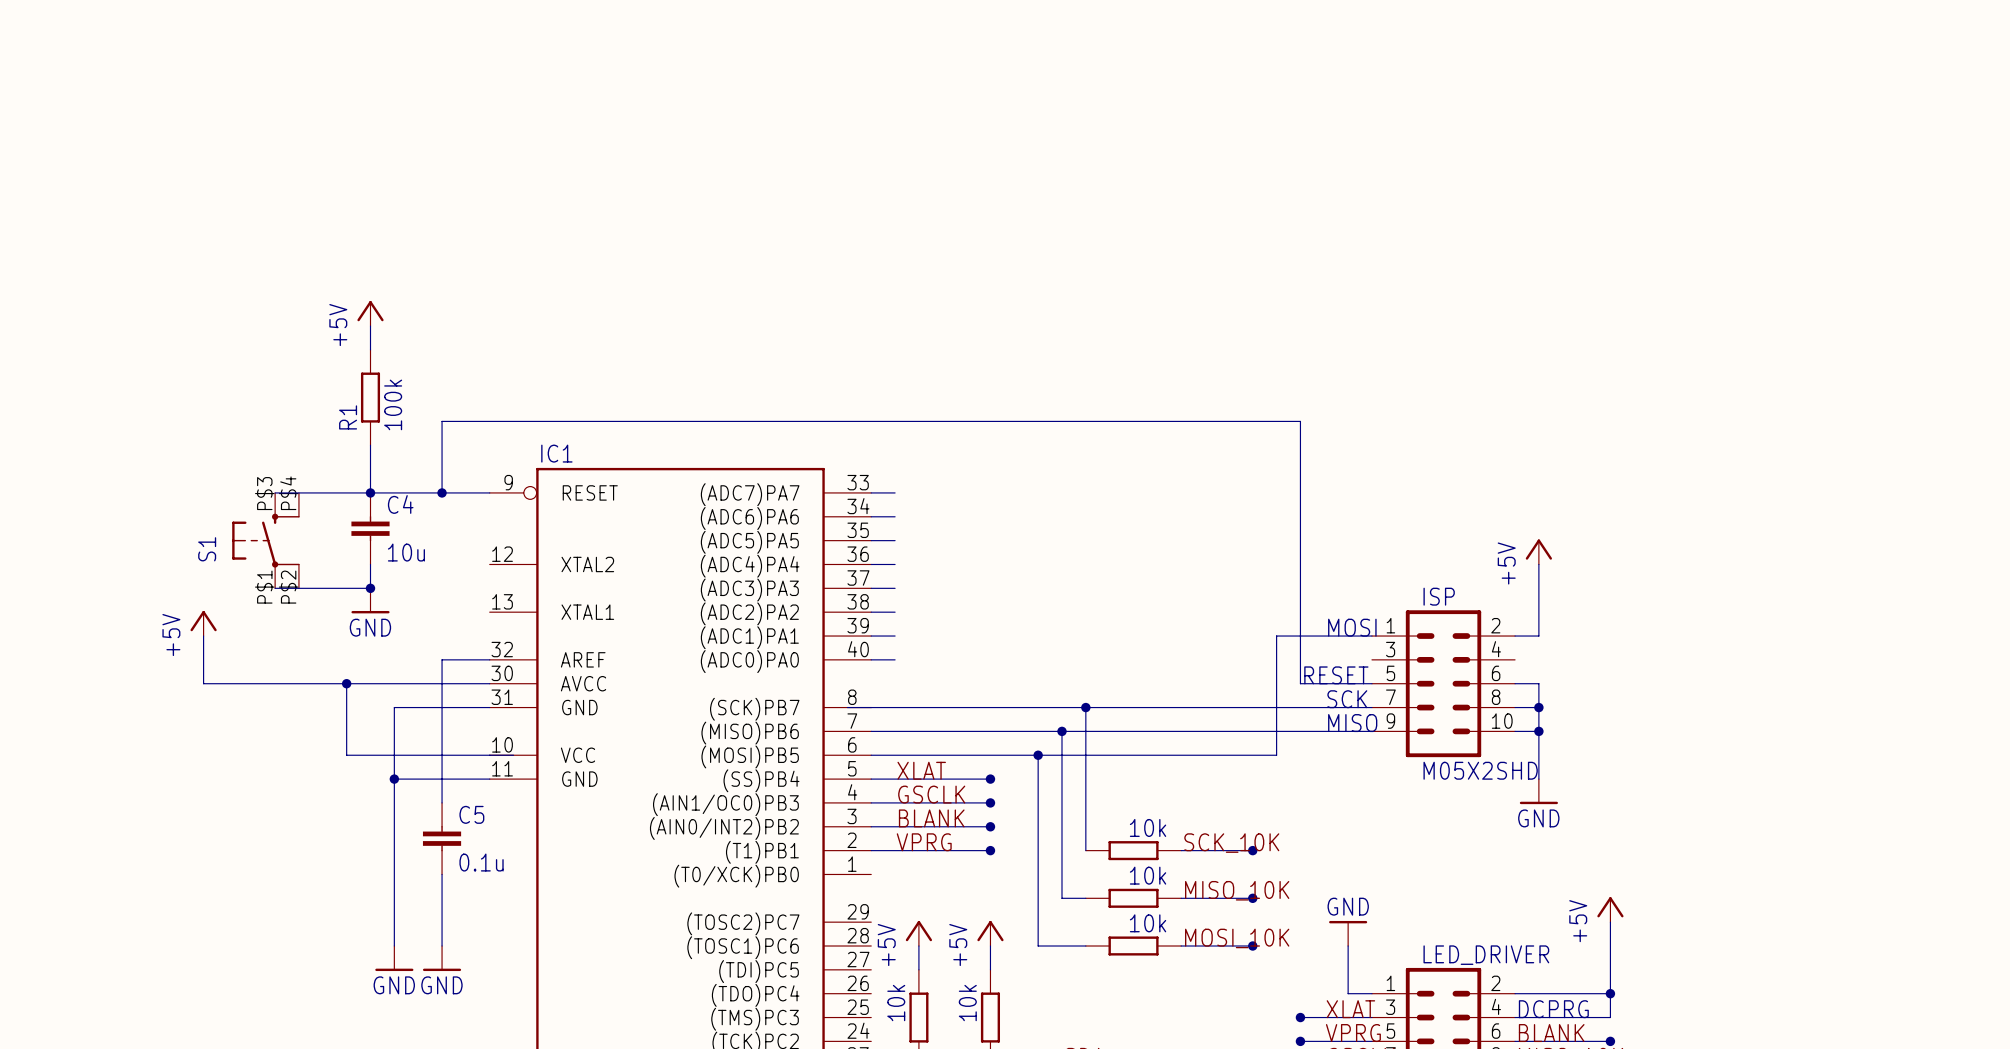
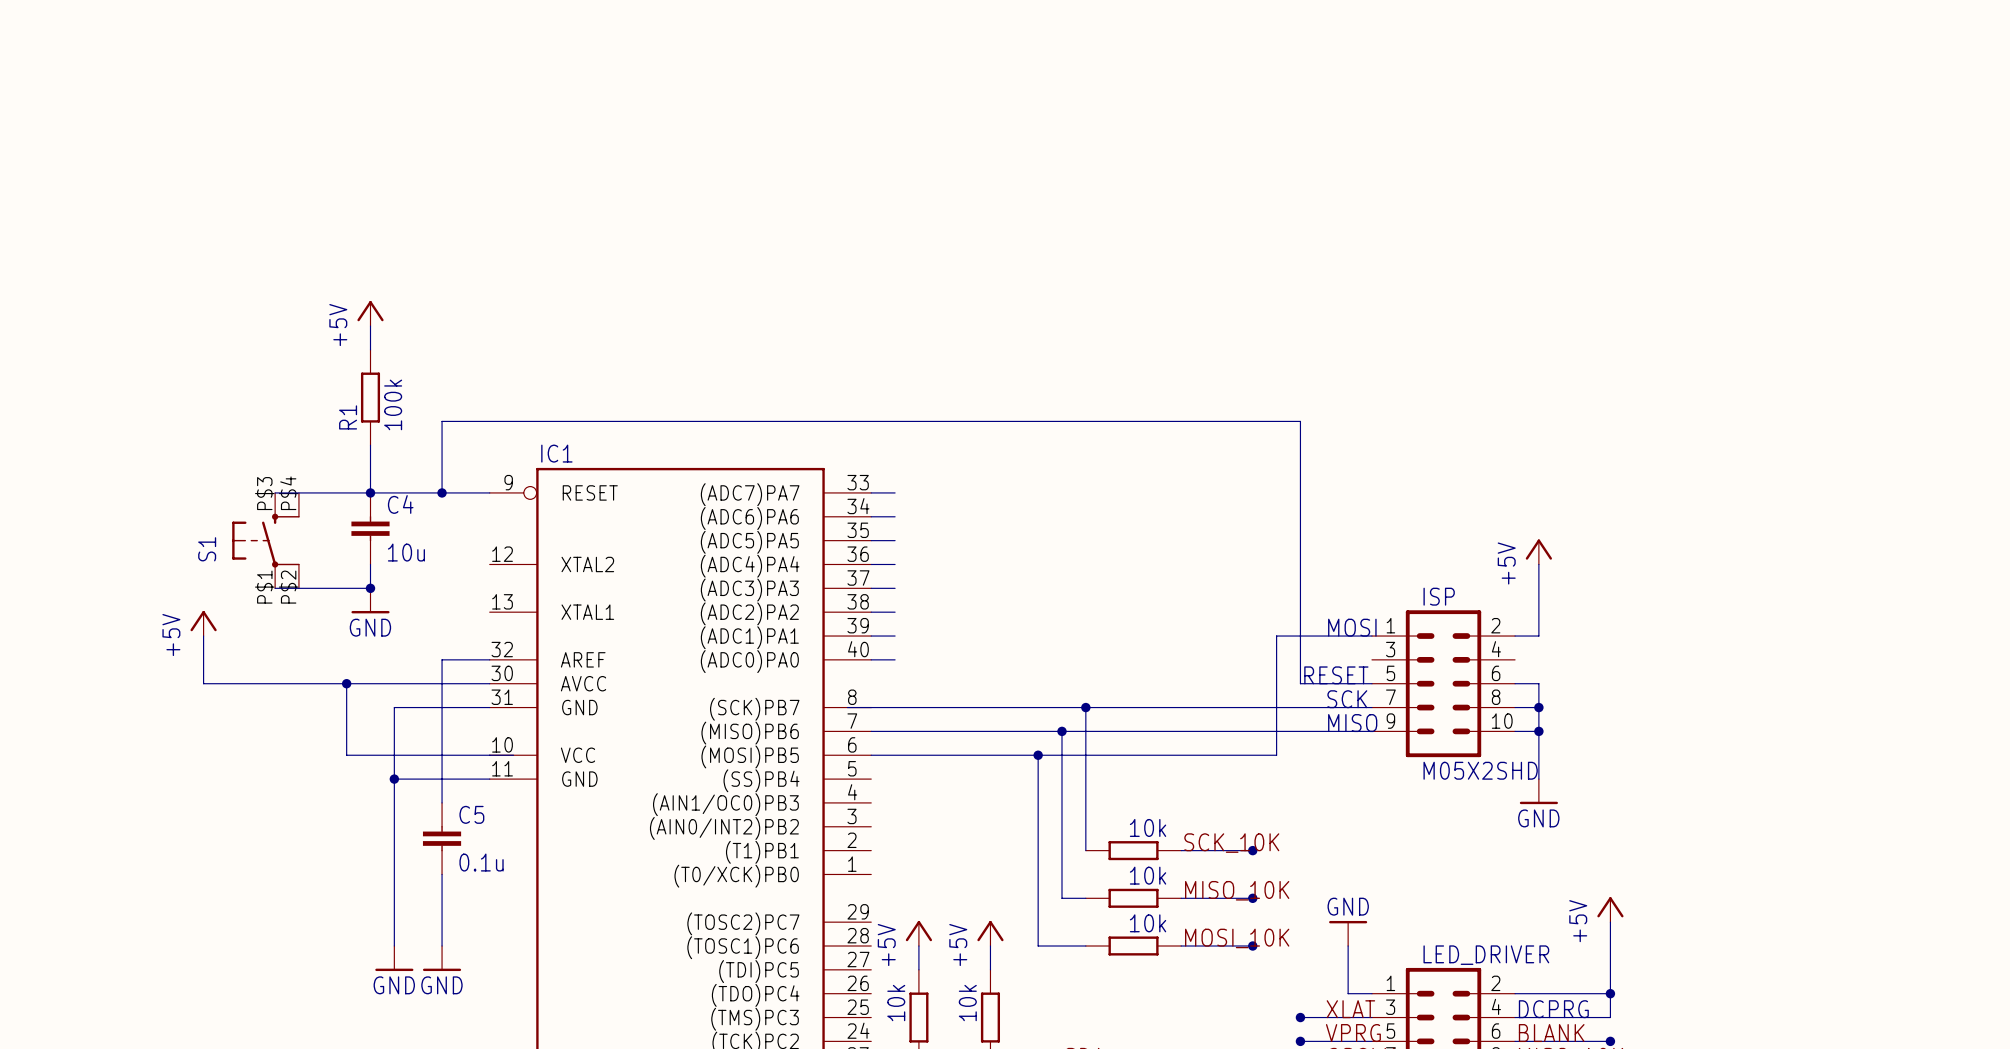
label: XLAT (921, 770) -> none
wire: (871, 779) (990, 779) -> none
junction: (990, 779) -> none
label: GSCLK (931, 794) -> none
wire: (871, 802) (990, 802) -> none
junction: (990, 802) -> none
label: BLANK (931, 818) -> none
wire: (871, 826) (990, 826) -> none
junction: (990, 826) -> none
label: VPRG (924, 842) -> none
wire: (871, 850) (990, 850) -> none
junction: (990, 850) -> none

